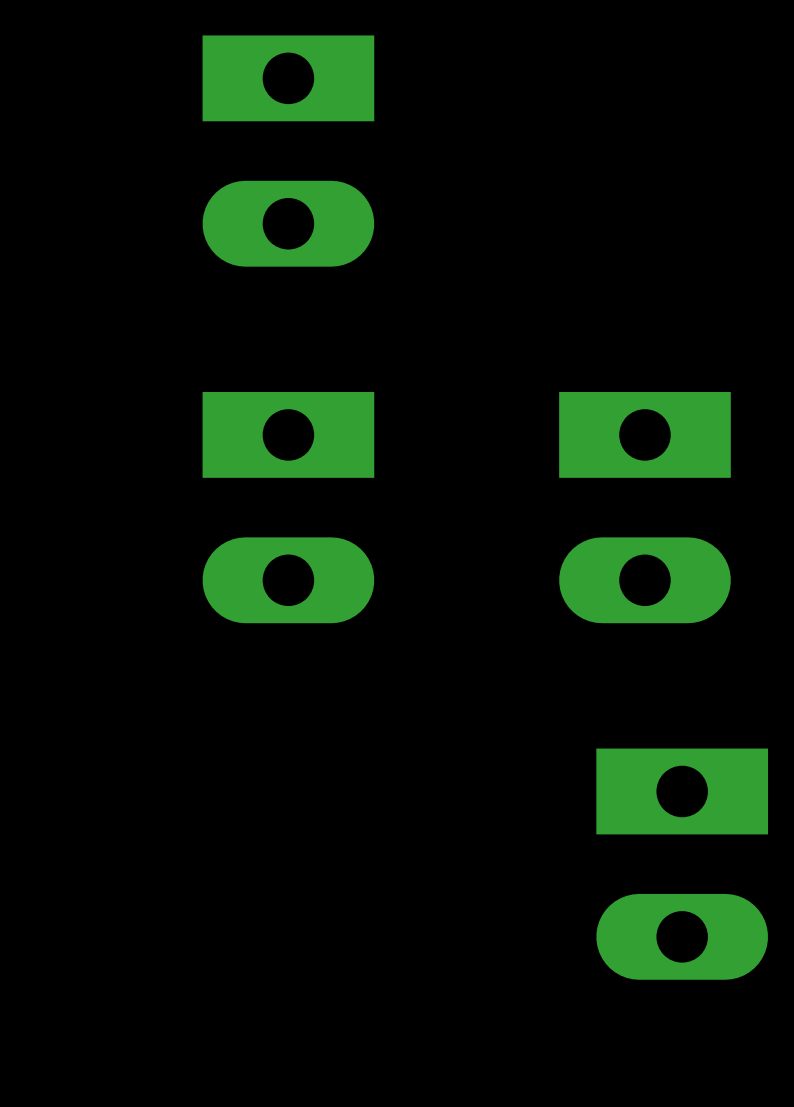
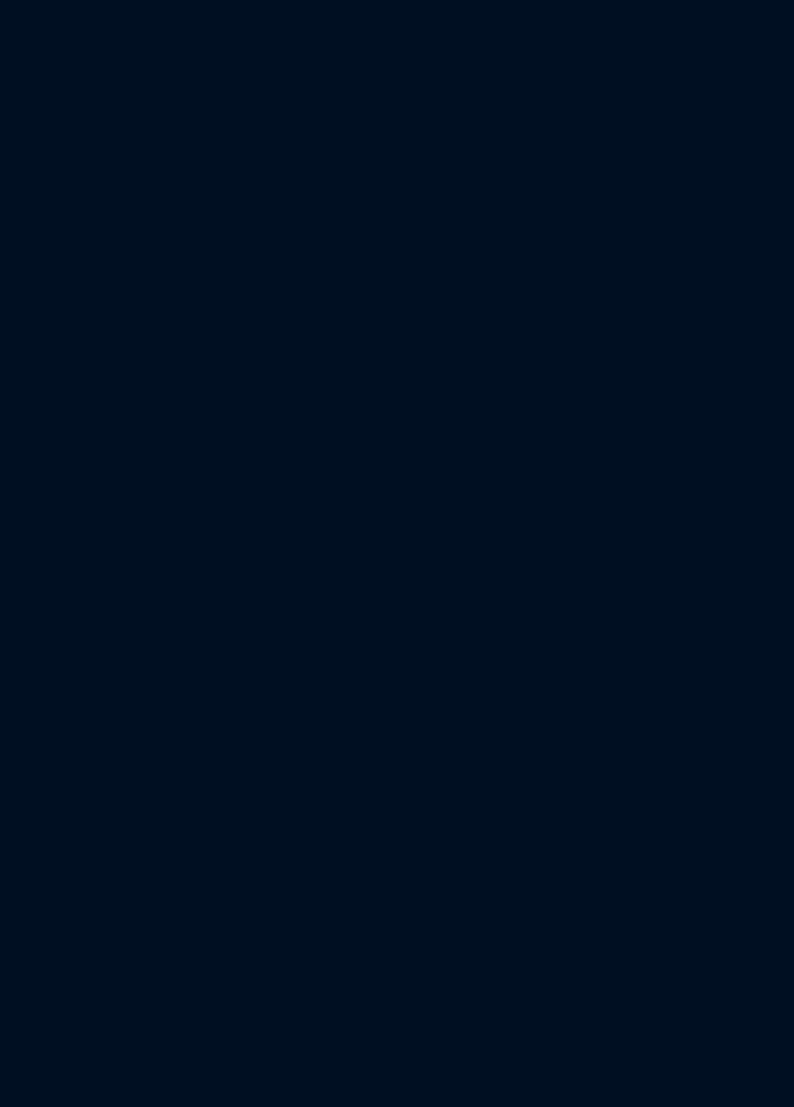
part: (288, 151) -> none
part: (288, 507) -> none
part: (644, 507) -> none
part: (682, 864) -> none

